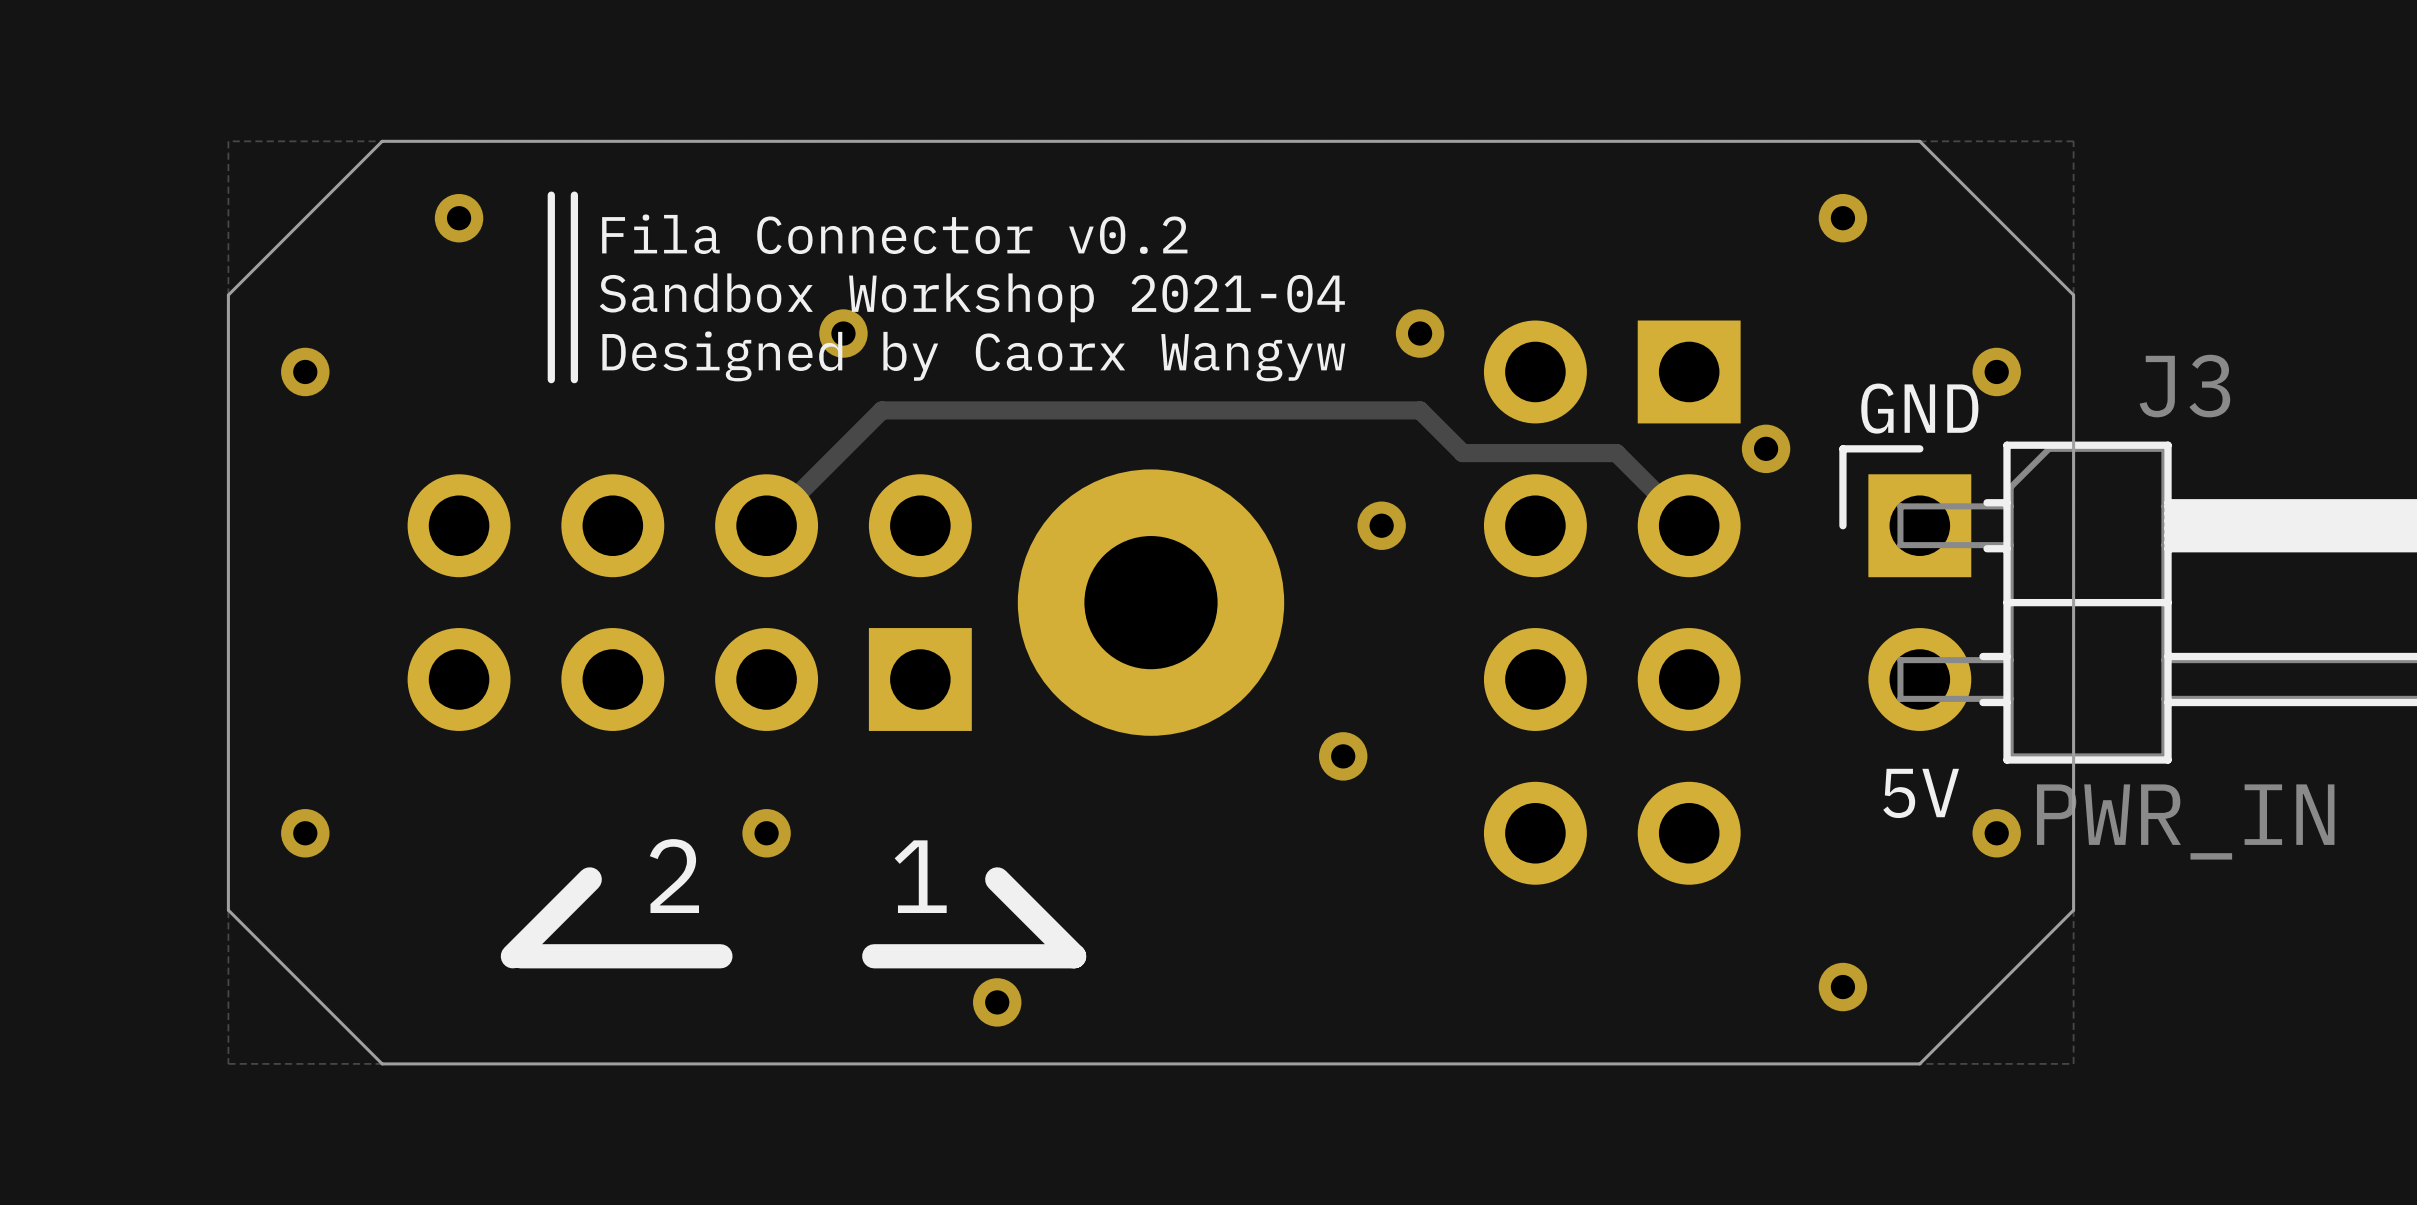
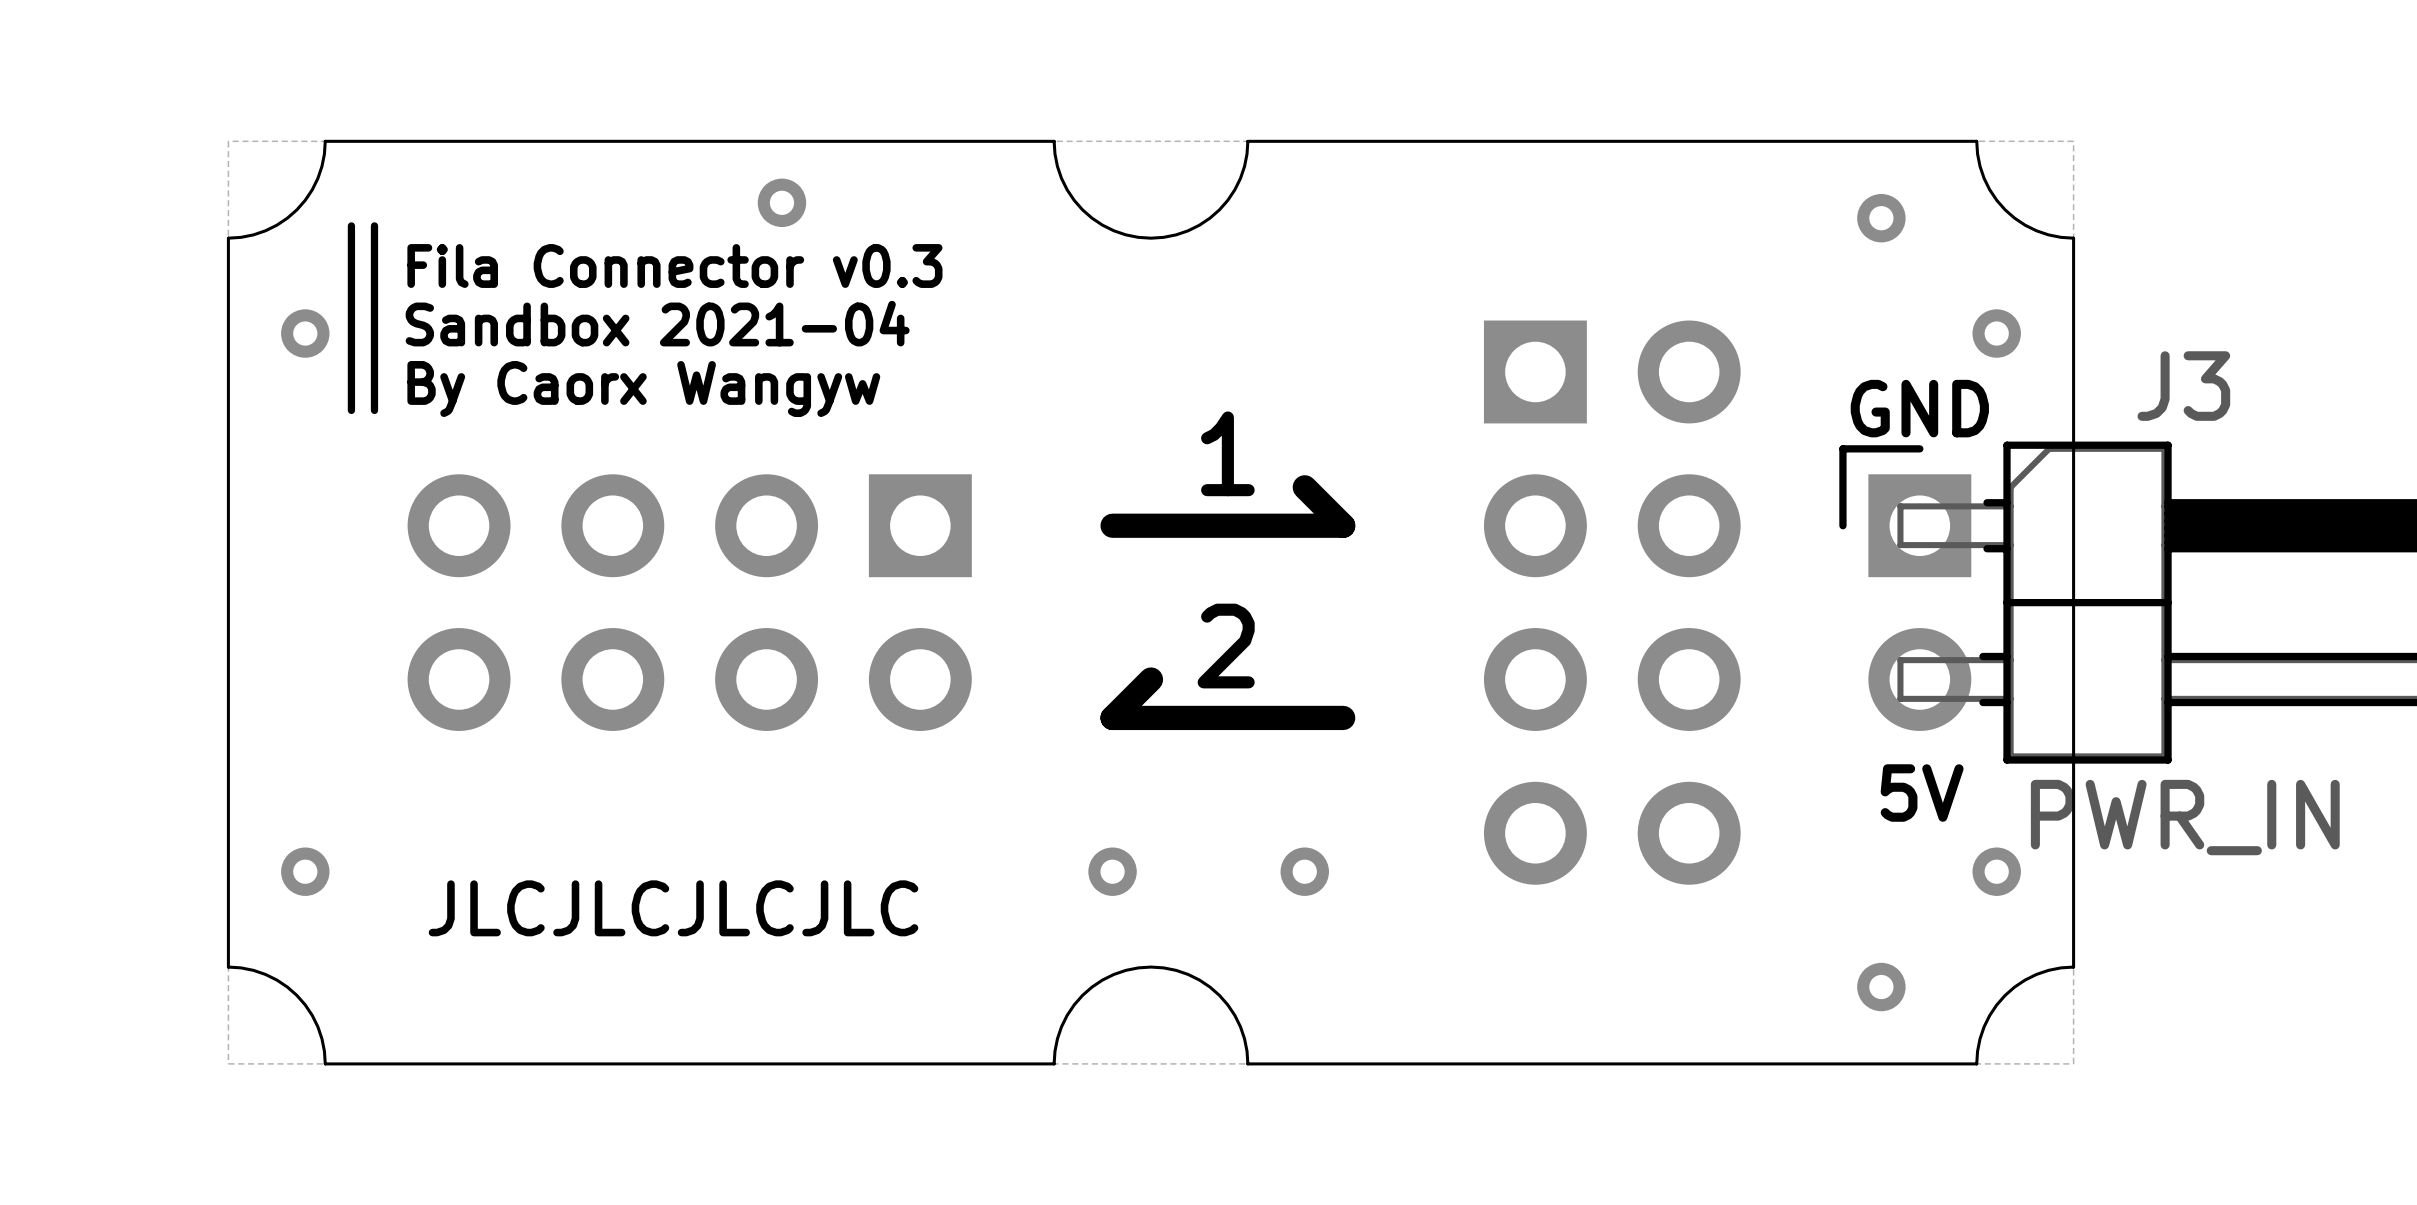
board edge: (382, 141) (228, 295) -> (382, 141) (325, 141) (324, 153) (317, 178) (312, 189) (296, 209) (276, 225) (265, 230) (253, 234) (228, 238) (228, 295)
board edge: (1247, 141) (1054, 141) -> (1247, 141) (1247, 153) (1240, 178) (1234, 189) (1219, 209) (1209, 218) (1188, 230) (1176, 234) (1151, 238) (1125, 234) (1113, 230) (1092, 218) (1082, 209) (1067, 189) (1061, 178) (1054, 153) (1054, 141)
board edge: (1919, 141) (2073, 295) -> (1919, 141) (1976, 141) (1980, 166) (1984, 178) (1989, 189) (2005, 209) (2014, 218) (2036, 230) (2048, 234) (2073, 238) (2073, 295)
line: (551, 195) (551, 379) -> (351, 225) (351, 410)
line: (574, 195) (574, 379) -> (374, 225) (374, 410)
via: (459, 218) -> none
via position: (1842, 218) -> (1881, 218)
text: Fila Connector v0.2 (894, 234) -> Fila Connector v0.3 (674, 266)
text: Sandbox Workshop 2021-04 (972, 297) -> Sandbox 2021-04 (657, 323)
part footprint: [1483, 320, 1741, 885] -> [1483, 320, 1741, 885]
via position: (843, 333) -> (781, 202)
via: (1420, 333) -> none
text: Designed by Caorx Wangyw (973, 356) -> By Caorx Wangyw (643, 389)
via position: (305, 371) -> (305, 333)
via position: (1996, 371) -> (1996, 333)
via: (1766, 448) -> none
part footprint: [407, 474, 972, 731] -> [407, 474, 972, 731]
line: none -> (1304, 487) (1343, 525) (1112, 525)
via: (1381, 525) -> none
track: (1689, 525) (1616, 453) (1462, 453) (1420, 410) (881, 410) (766, 525) -> none
part: (1151, 602) -> none
line: none -> (1151, 679) (1112, 717) (1343, 717)
via position: (1343, 756) -> (1304, 871)
via position: (305, 833) -> (305, 871)
via: (766, 833) -> none
via position: (1996, 833) -> (1996, 871)
via: none -> (1112, 871)
text position: 2 (674, 876) -> 2 (1226, 646)
text position: 1 (920, 876) -> 1 (1227, 453)
line: (589, 879) (512, 956) -> none
line: (997, 879) (1074, 956) (874, 956) -> none
text: none -> JLCJLCJLCJLC (673, 908)
board edge: (228, 910) (382, 1063) -> (228, 910) (228, 967) (253, 970) (265, 974) (287, 987) (296, 995) (312, 1015) (317, 1026) (321, 1038) (325, 1063) (382, 1063)
board edge: (2073, 910) (1919, 1063) -> (2073, 910) (2073, 967) (2048, 970) (2036, 974) (2014, 987) (2005, 995) (1989, 1015) (1984, 1026) (1977, 1051) (1976, 1063) (1919, 1063)
line: (720, 956) (520, 956) -> none
via position: (1842, 987) -> (1881, 987)
via: (997, 1002) -> none
board edge: (1247, 1063) (1054, 1063) -> (1247, 1063) (1247, 1051) (1240, 1026) (1234, 1015) (1219, 995) (1199, 980) (1188, 974) (1176, 970) (1151, 967) (1125, 970) (1113, 974) (1102, 980) (1082, 995) (1067, 1015) (1061, 1026) (1054, 1051) (1054, 1063)

